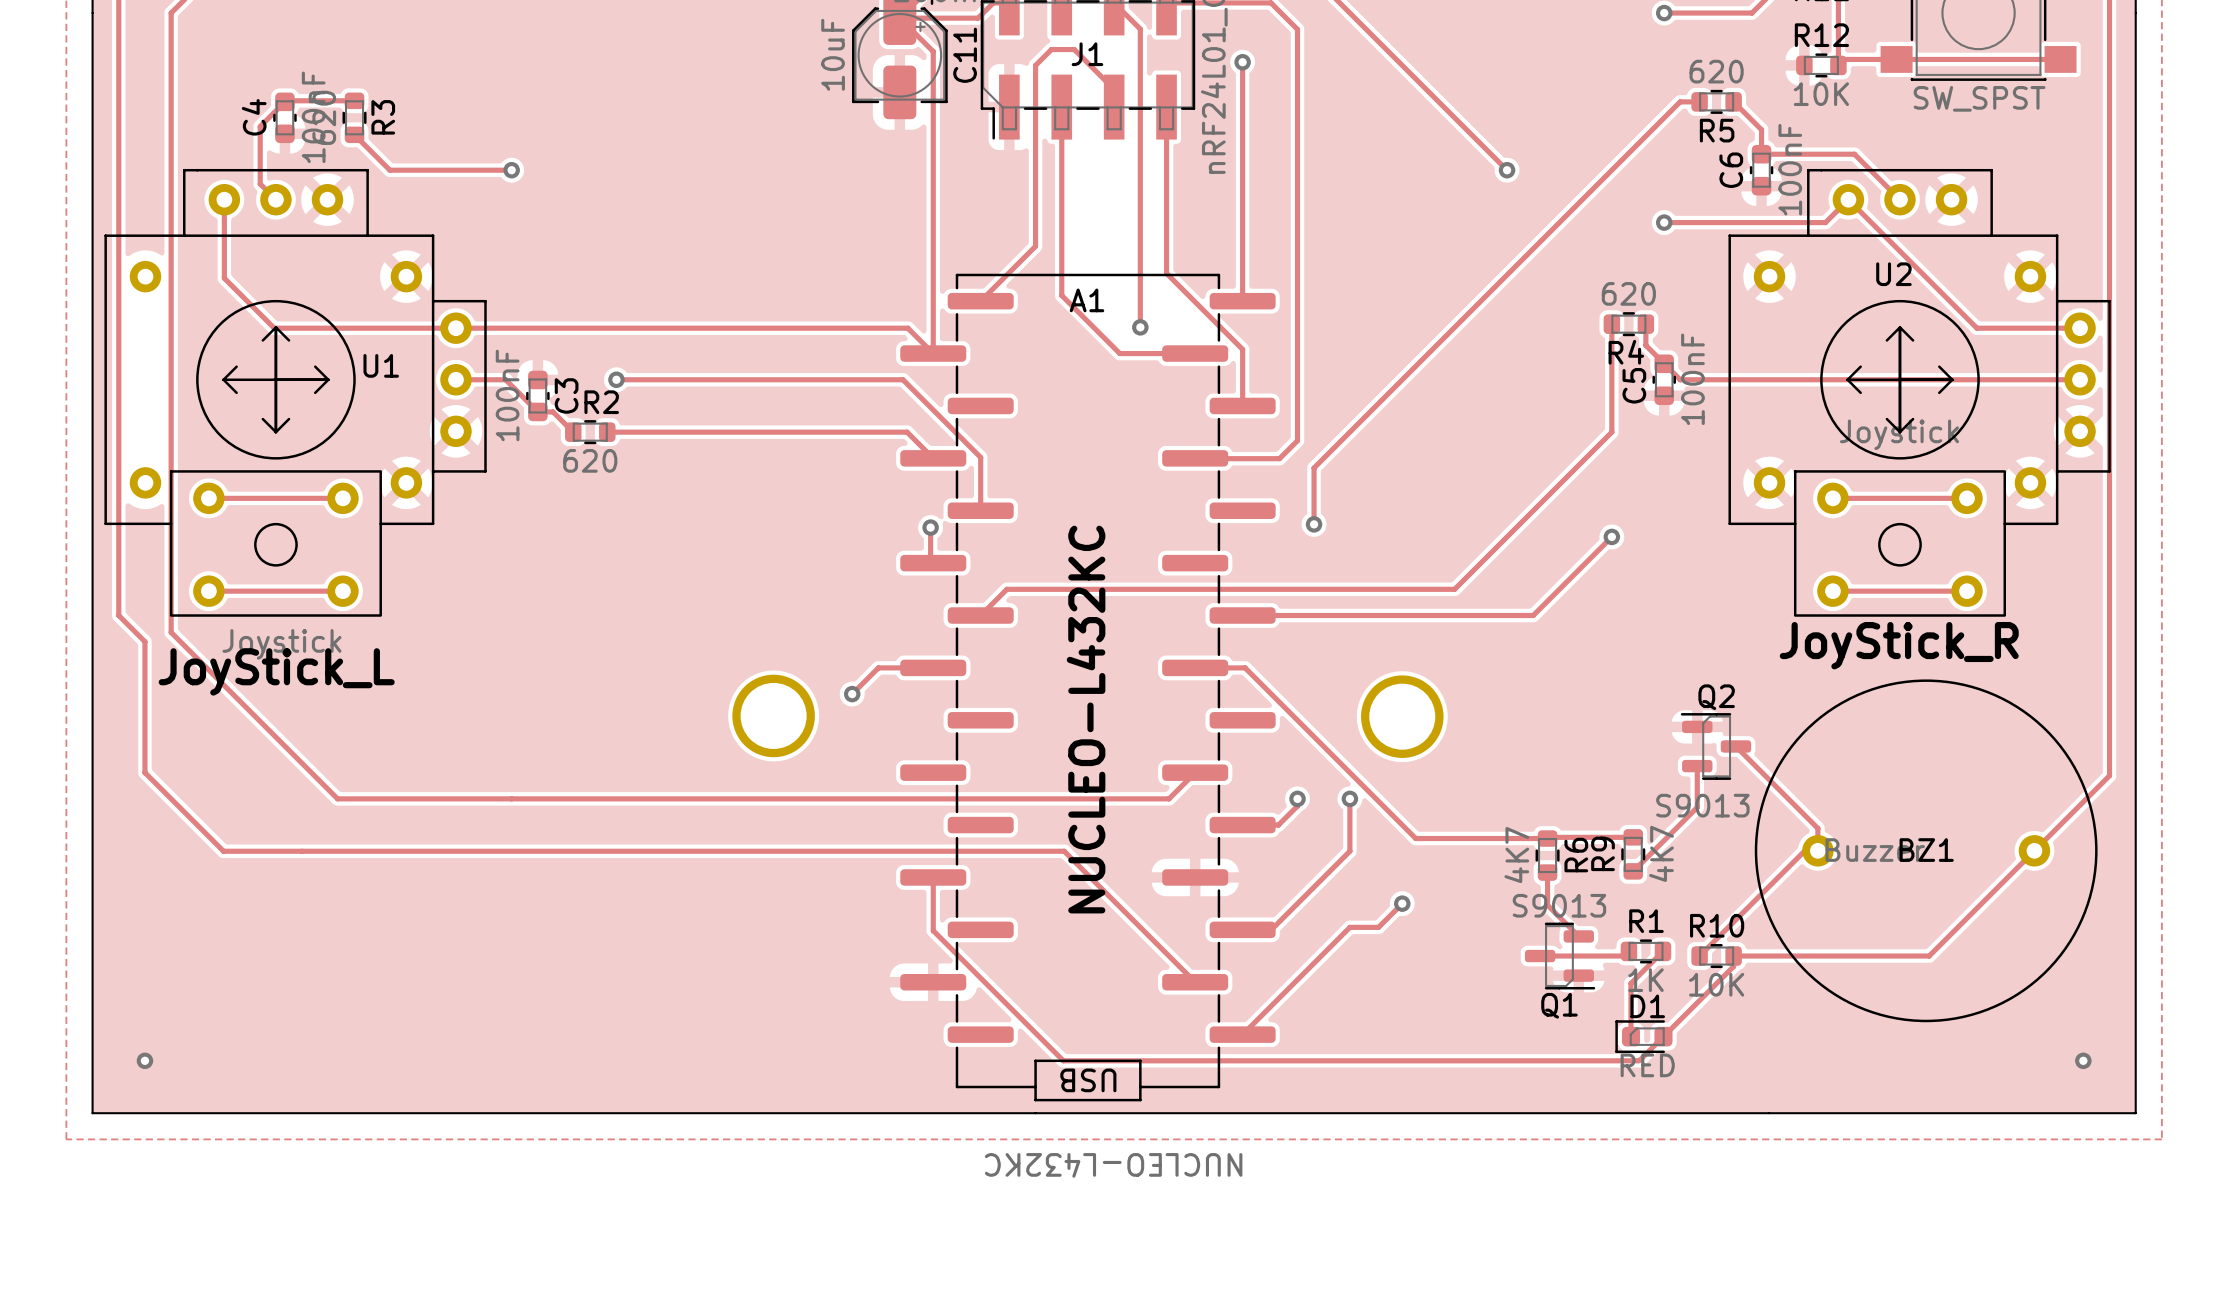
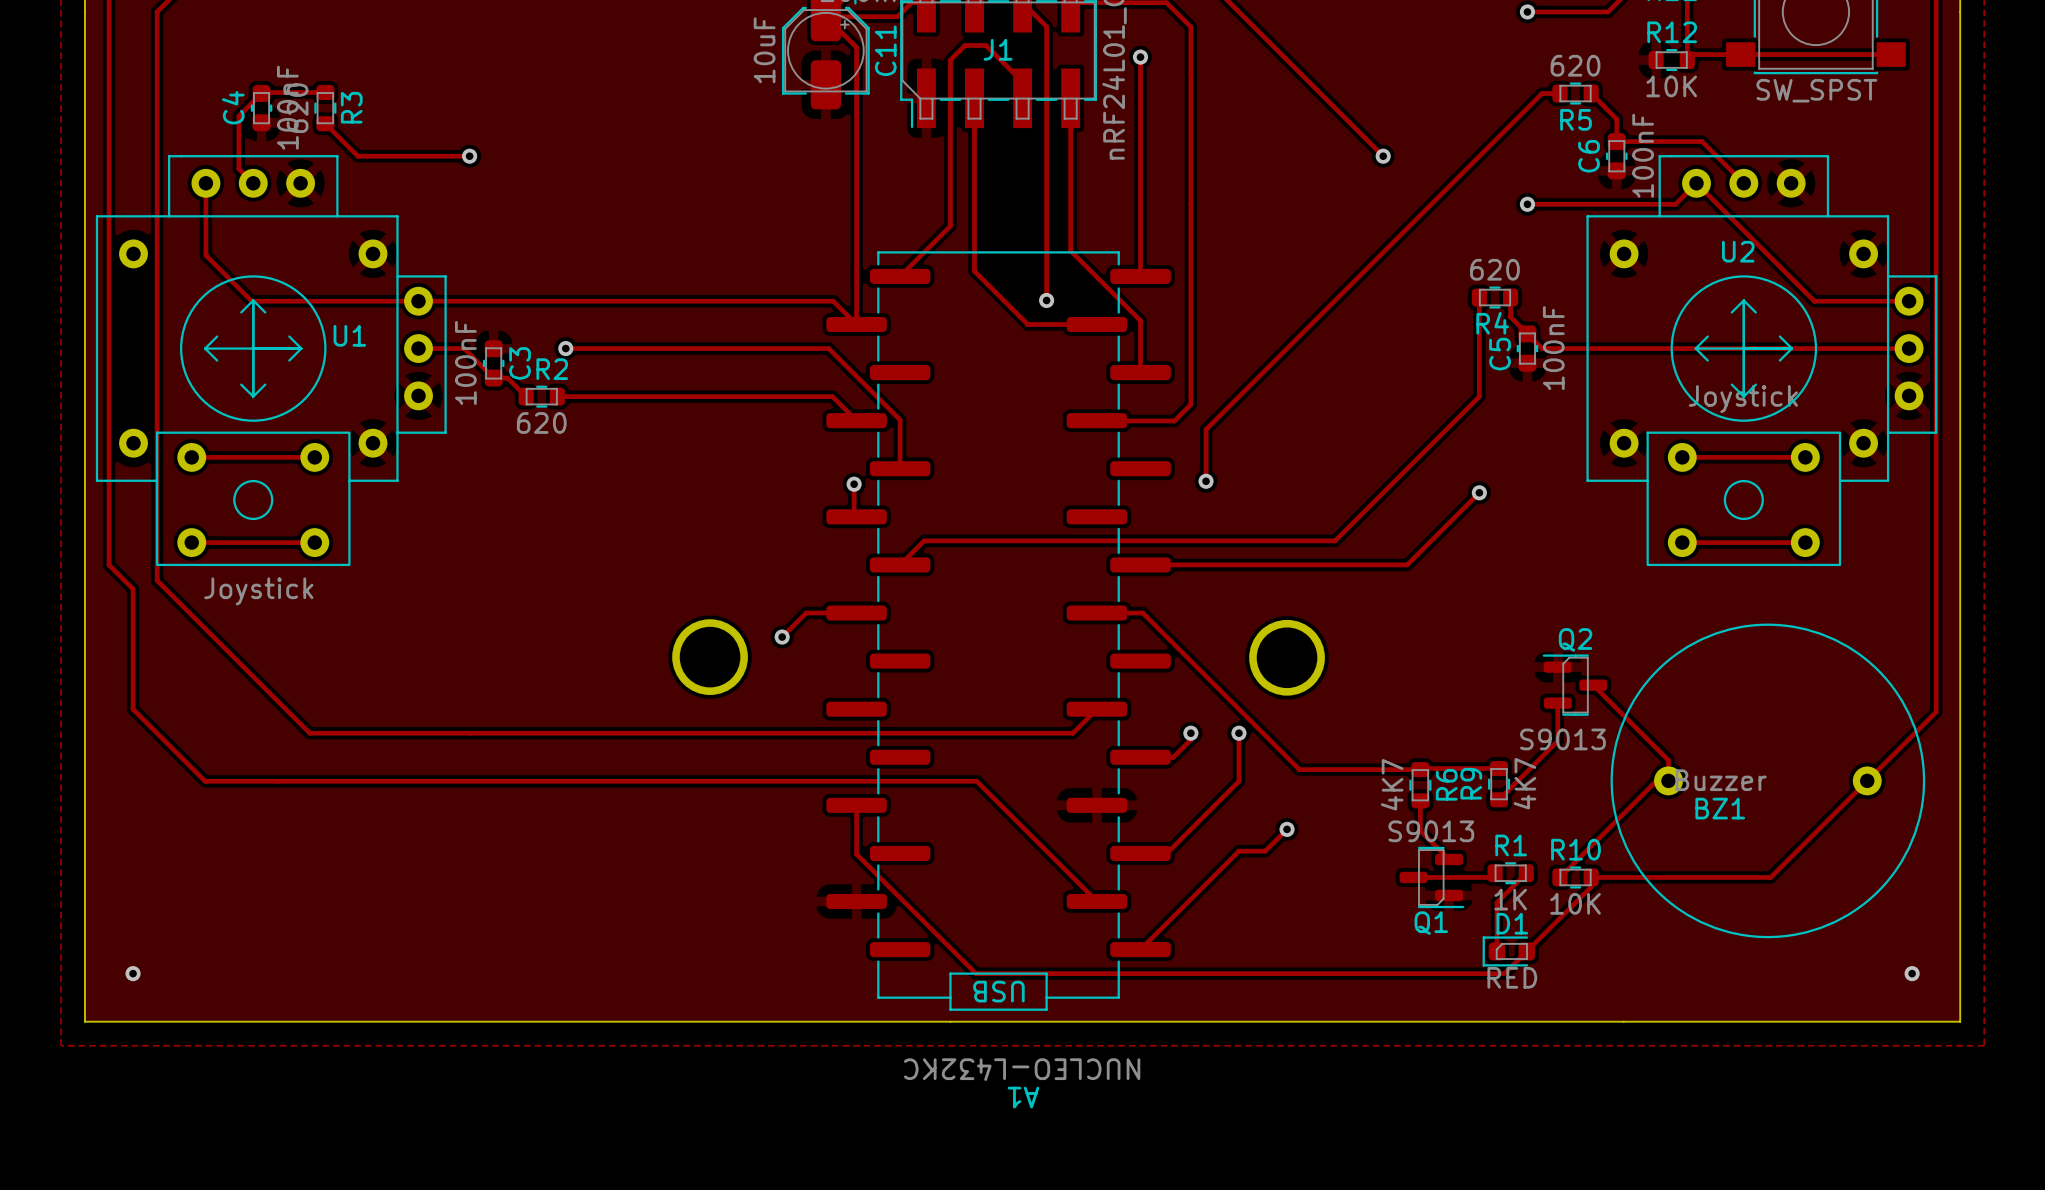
A1 name rotation: 0° (1086, 300) -> 180° (1023, 1097)
A1 name position: A1 (1086, 300) -> A1 (1023, 1097)
text: JoyStick_R (1899, 645) -> none
text: JoyStick_L (276, 671) -> none
text: NUCLEO-L432KC (1086, 719) -> none
BZ1 name position: BZ1 (1926, 850) -> BZ1 (1720, 808)

